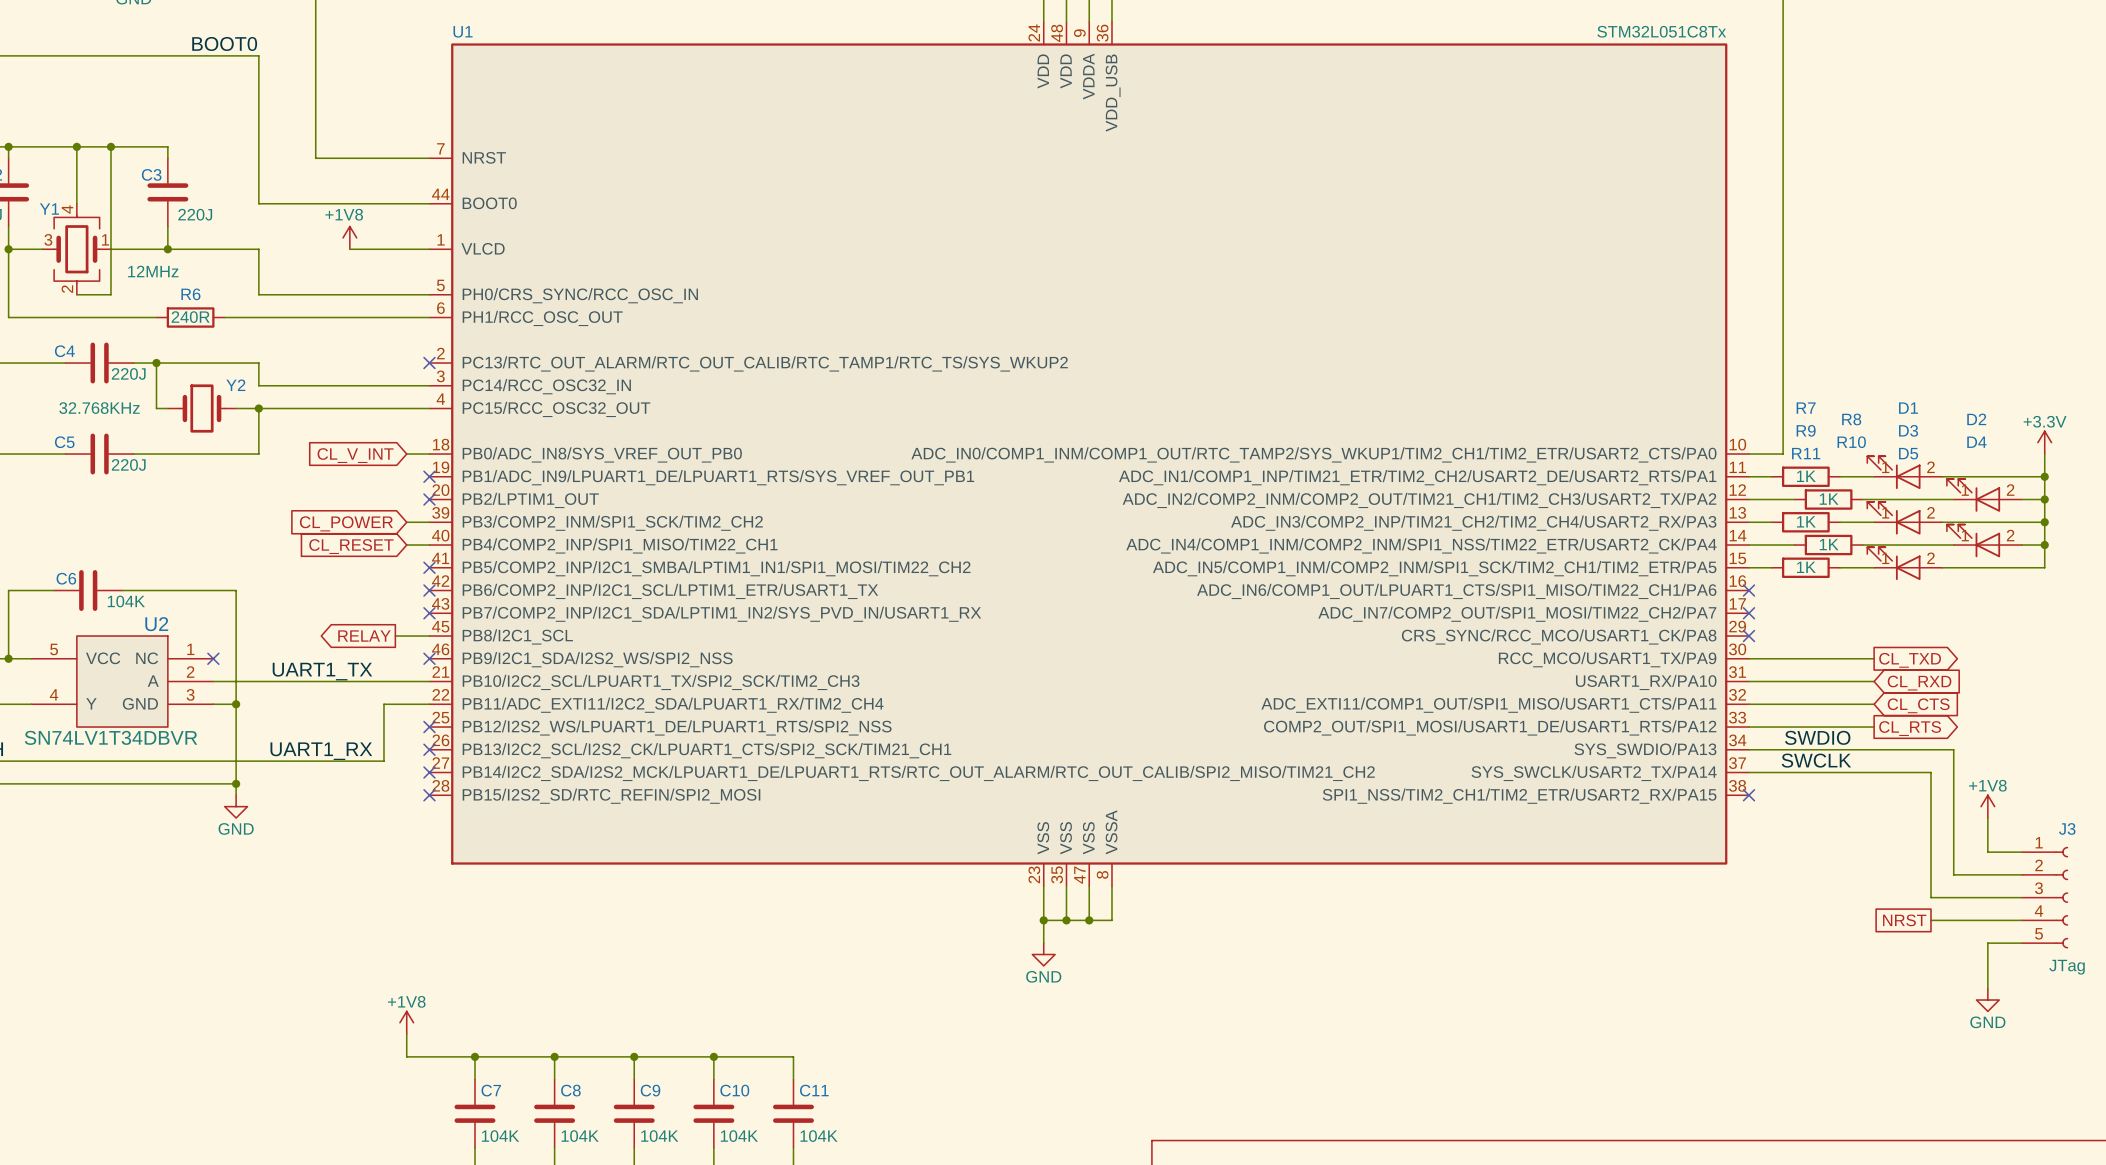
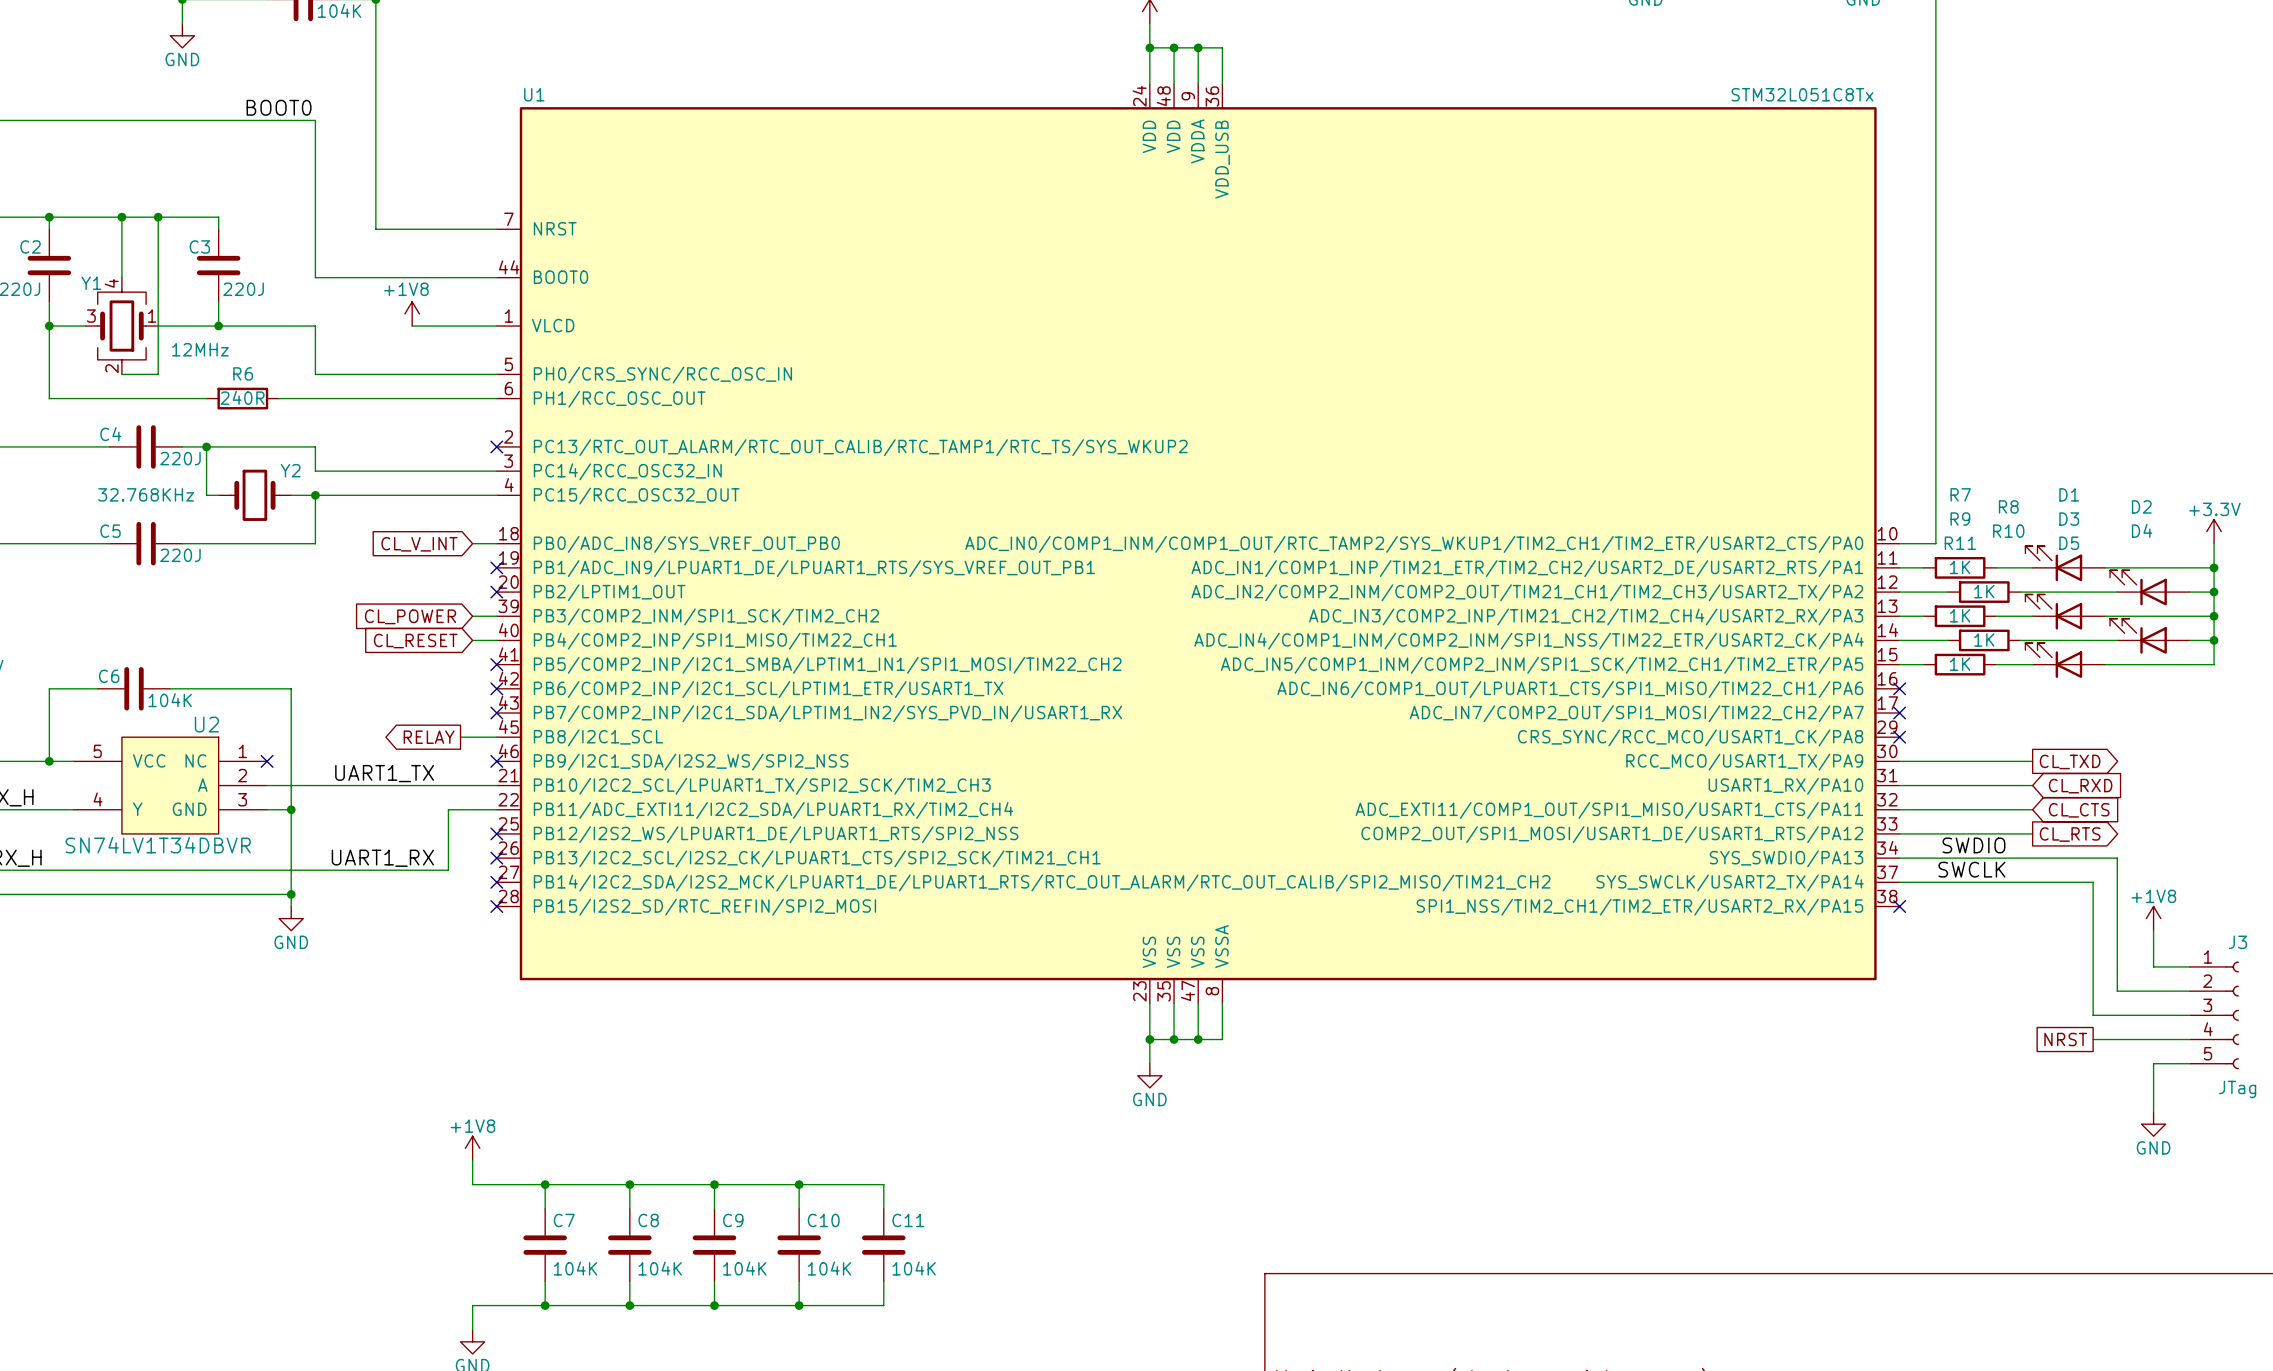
D1 symbol: [1867, 456, 1943, 490] -> [2025, 546, 2106, 582]
D2 symbol: [1946, 479, 2022, 512] -> [2110, 570, 2190, 606]
D3 symbol: [1867, 501, 1943, 535] -> [2025, 594, 2106, 630]
D4 symbol: [1946, 524, 2022, 558] -> [2110, 618, 2190, 654]
D5 symbol: [1867, 547, 1943, 581] -> [2025, 642, 2106, 678]

